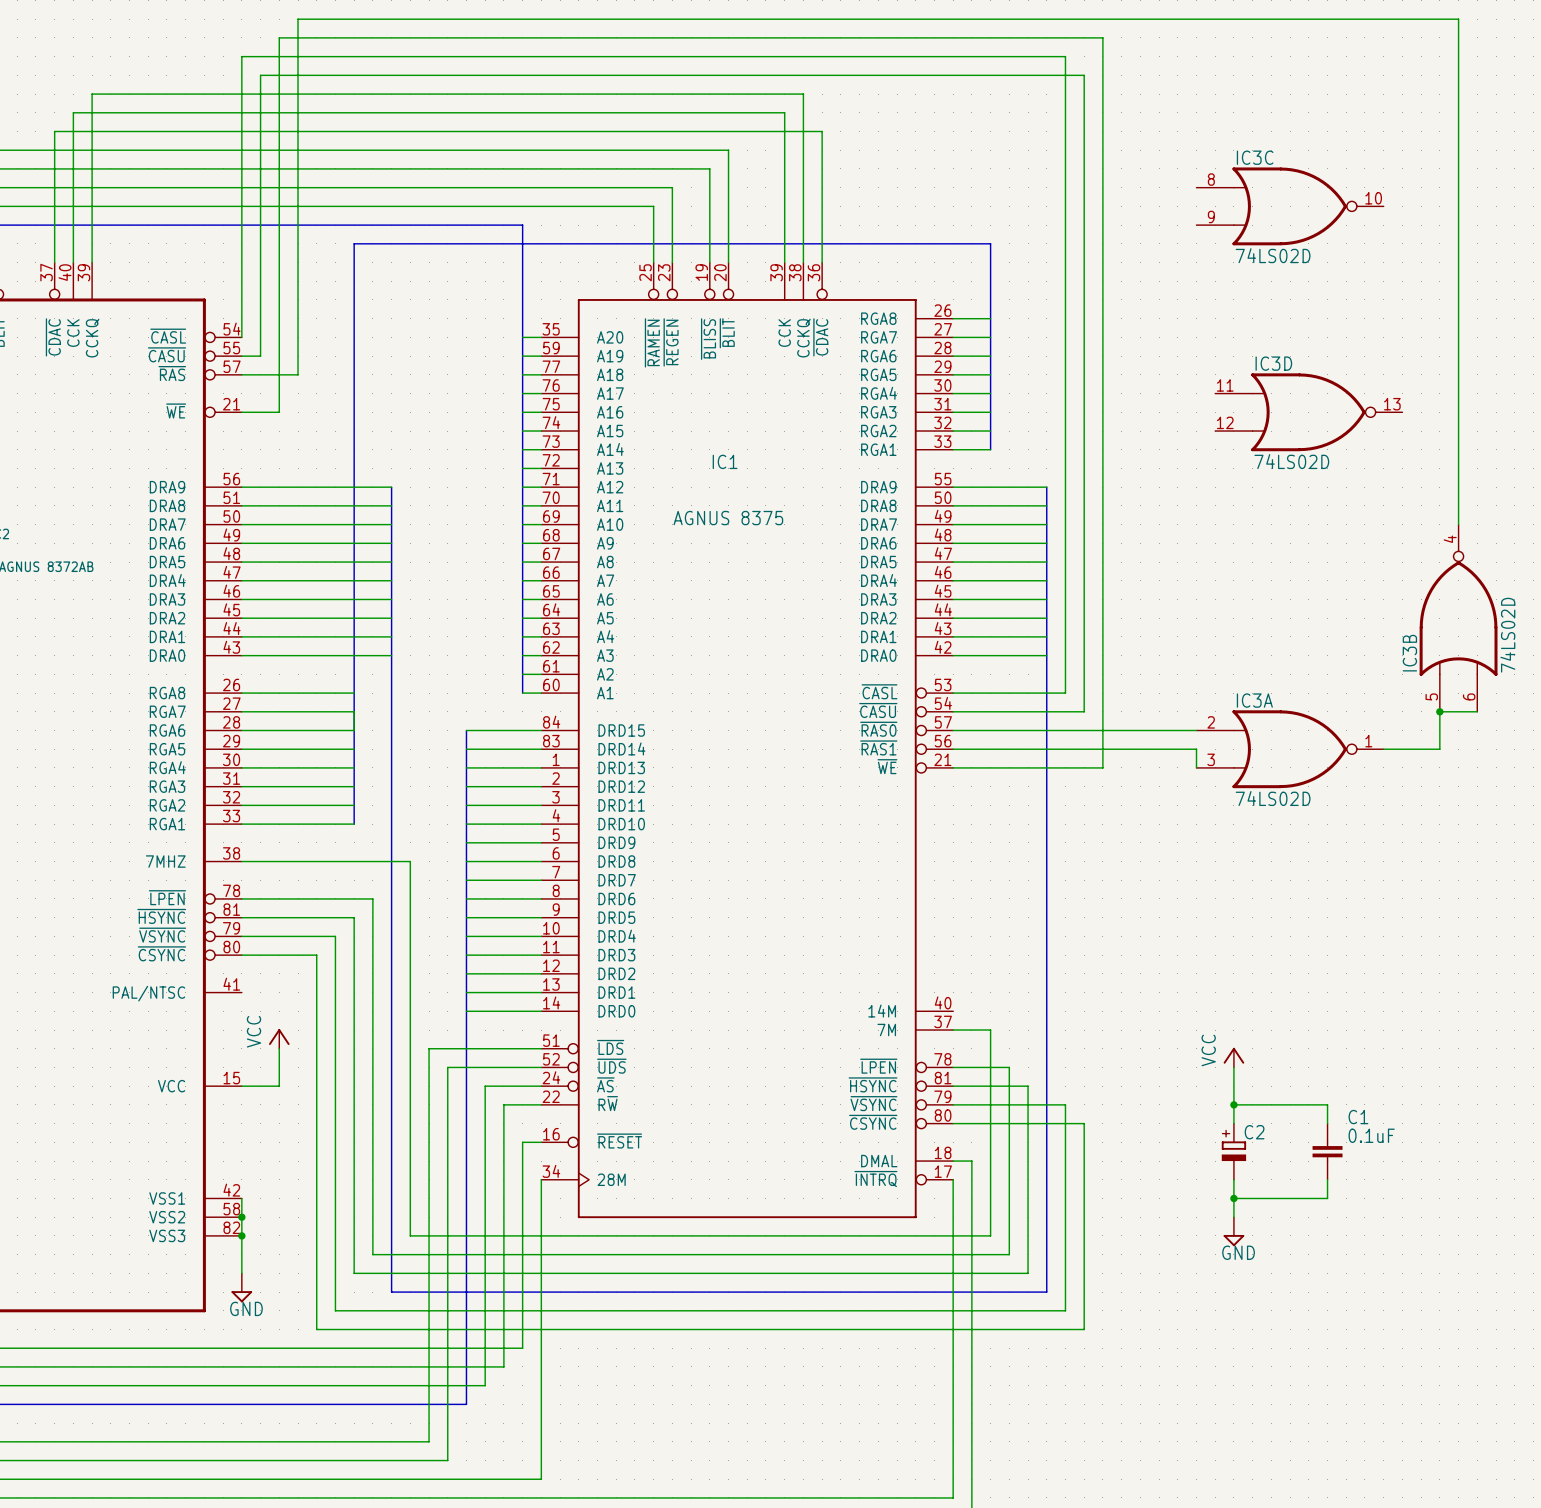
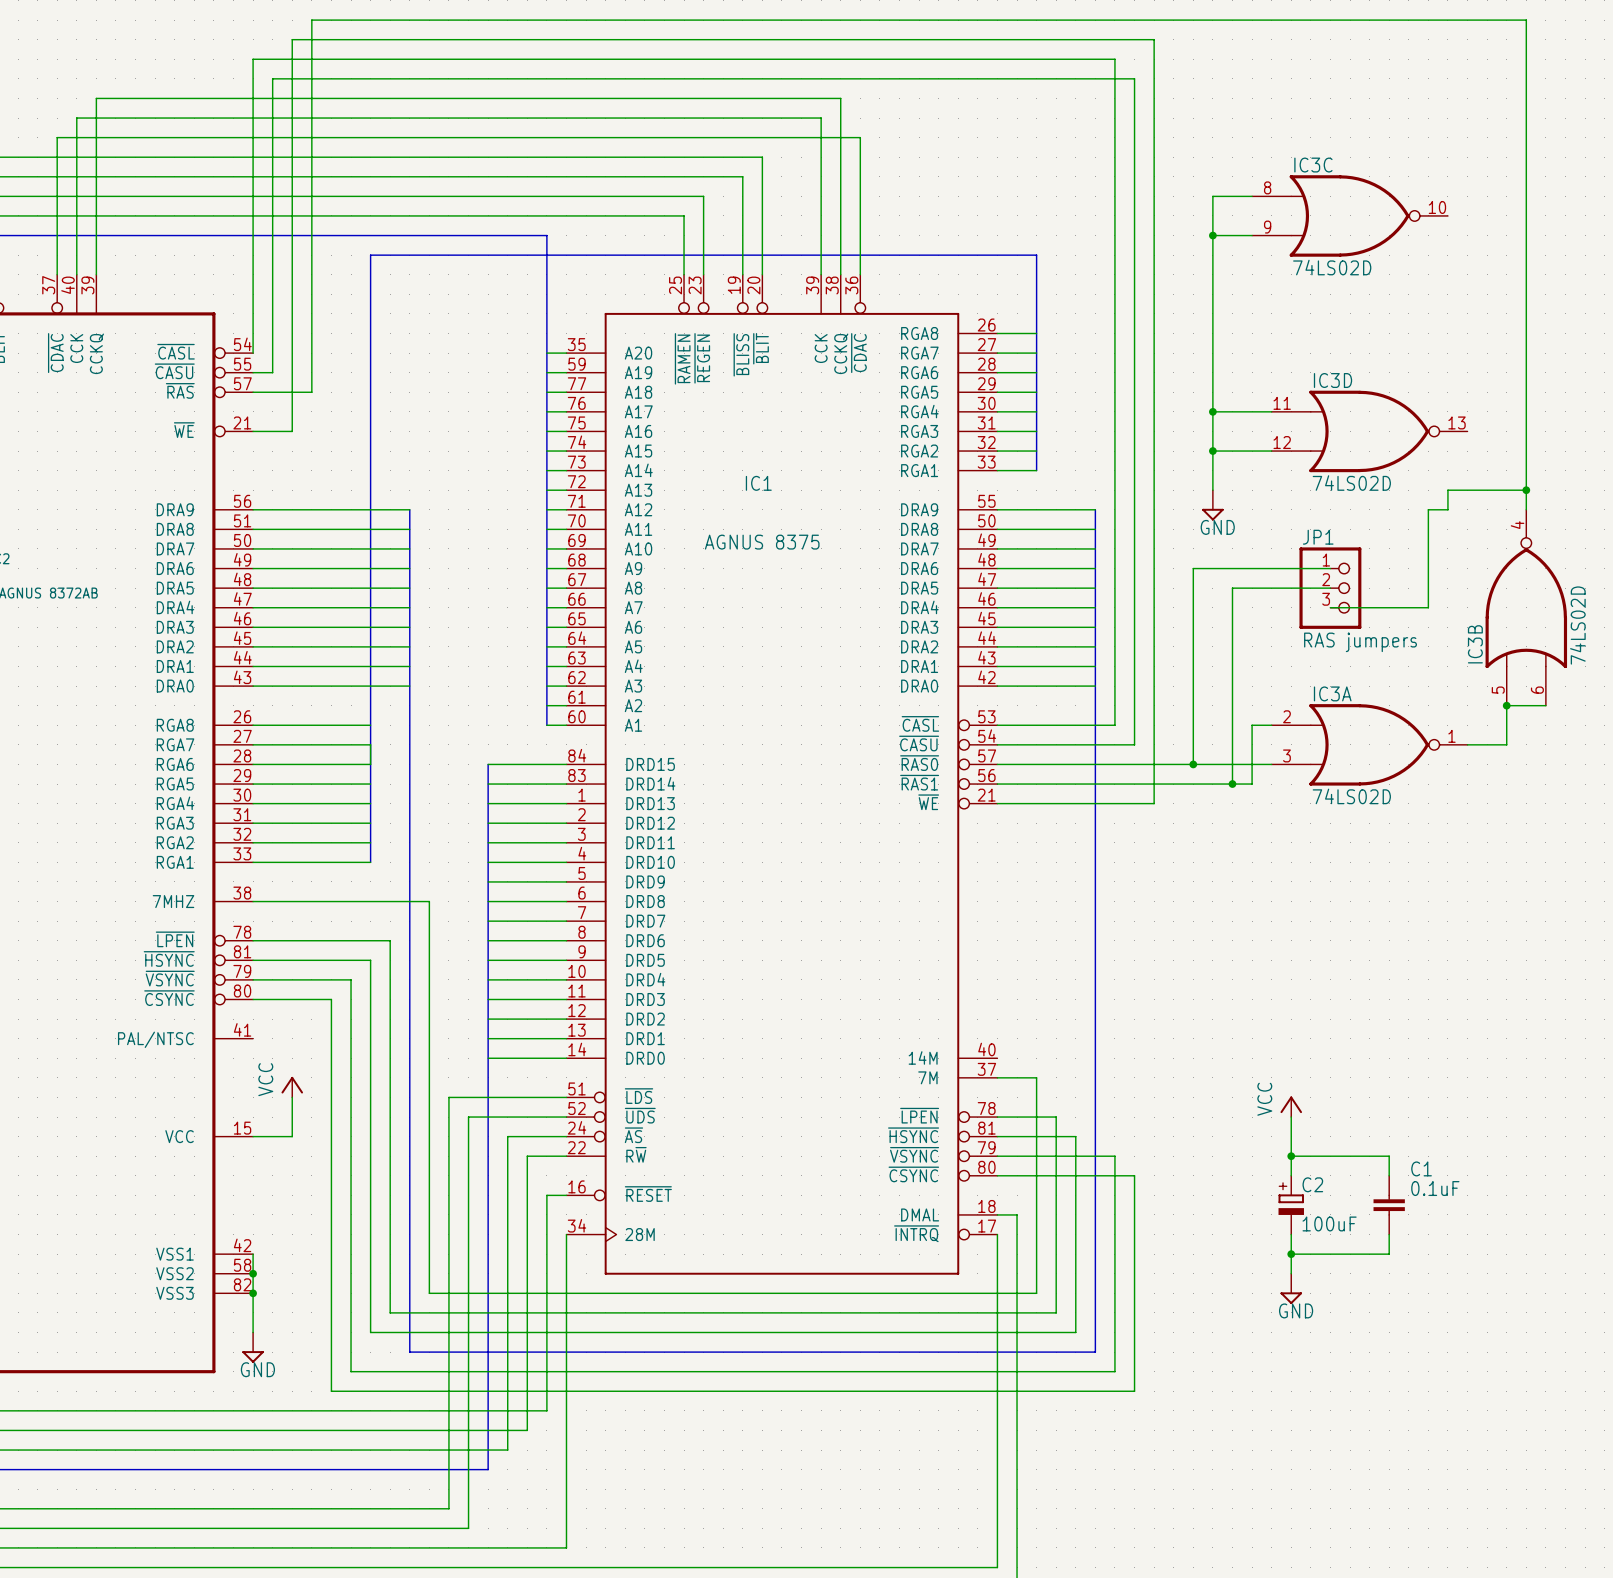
wire: none -> (1252, 196) (1212, 196) (1212, 490)
wire: none -> (1212, 235) (1252, 235)
junction: none -> (1212, 235)
wire: none -> (1212, 411) (1271, 411)
junction: none -> (1212, 411)
wire: none -> (1212, 451) (1271, 451)
junction: none -> (1212, 451)
wire: none -> (1526, 490) (1447, 490) (1447, 509) (1428, 509) (1428, 607) (1330, 607)
junction: none -> (1526, 490)
power symbol: none -> GND (1212, 505)
wire: none -> (1330, 568) (1193, 568) (1193, 764)
wire: none -> (1330, 588) (1232, 588) (1232, 784)
JP1: none -> RAS jumpers (1330, 588)
IC3B position: (1458, 618) -> (1526, 607)
wire: none -> (1545, 705) (1506, 705) (1506, 744) (1467, 744)
junction position: (1439, 711) -> (1506, 705)
wire: (1477, 711) (1439, 711) (1439, 749) (1383, 749) -> none
junction: none -> (1193, 764)
junction: none -> (1232, 784)
wire: (1196, 749) (1196, 767) -> (1252, 784) (1252, 725) (1271, 725)
IC3A position: (1290, 749) -> (1369, 744)
C2 value: none -> 100uF (1329, 1223)

